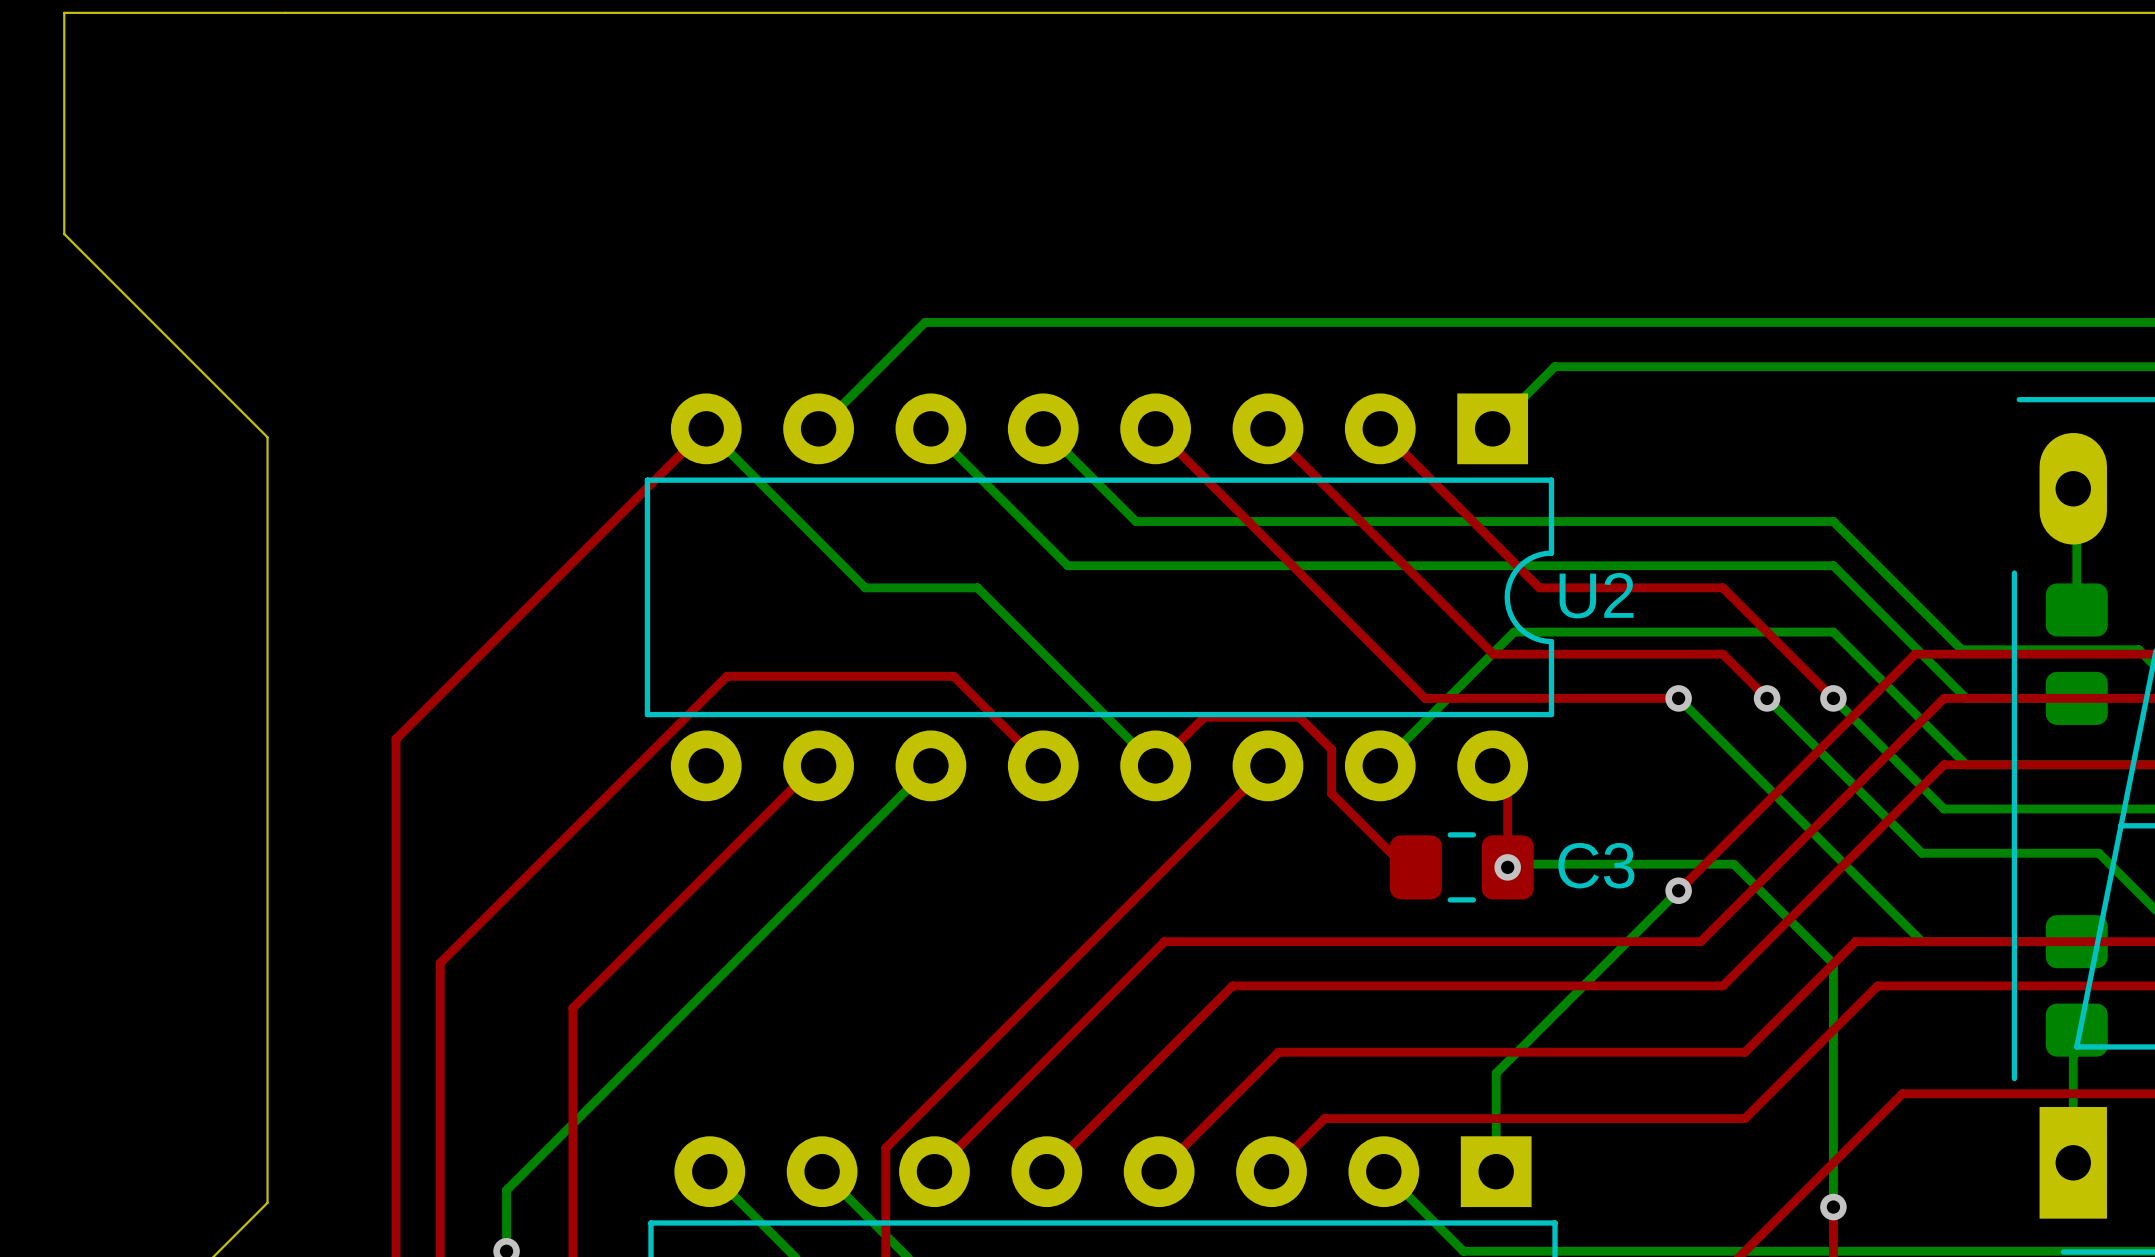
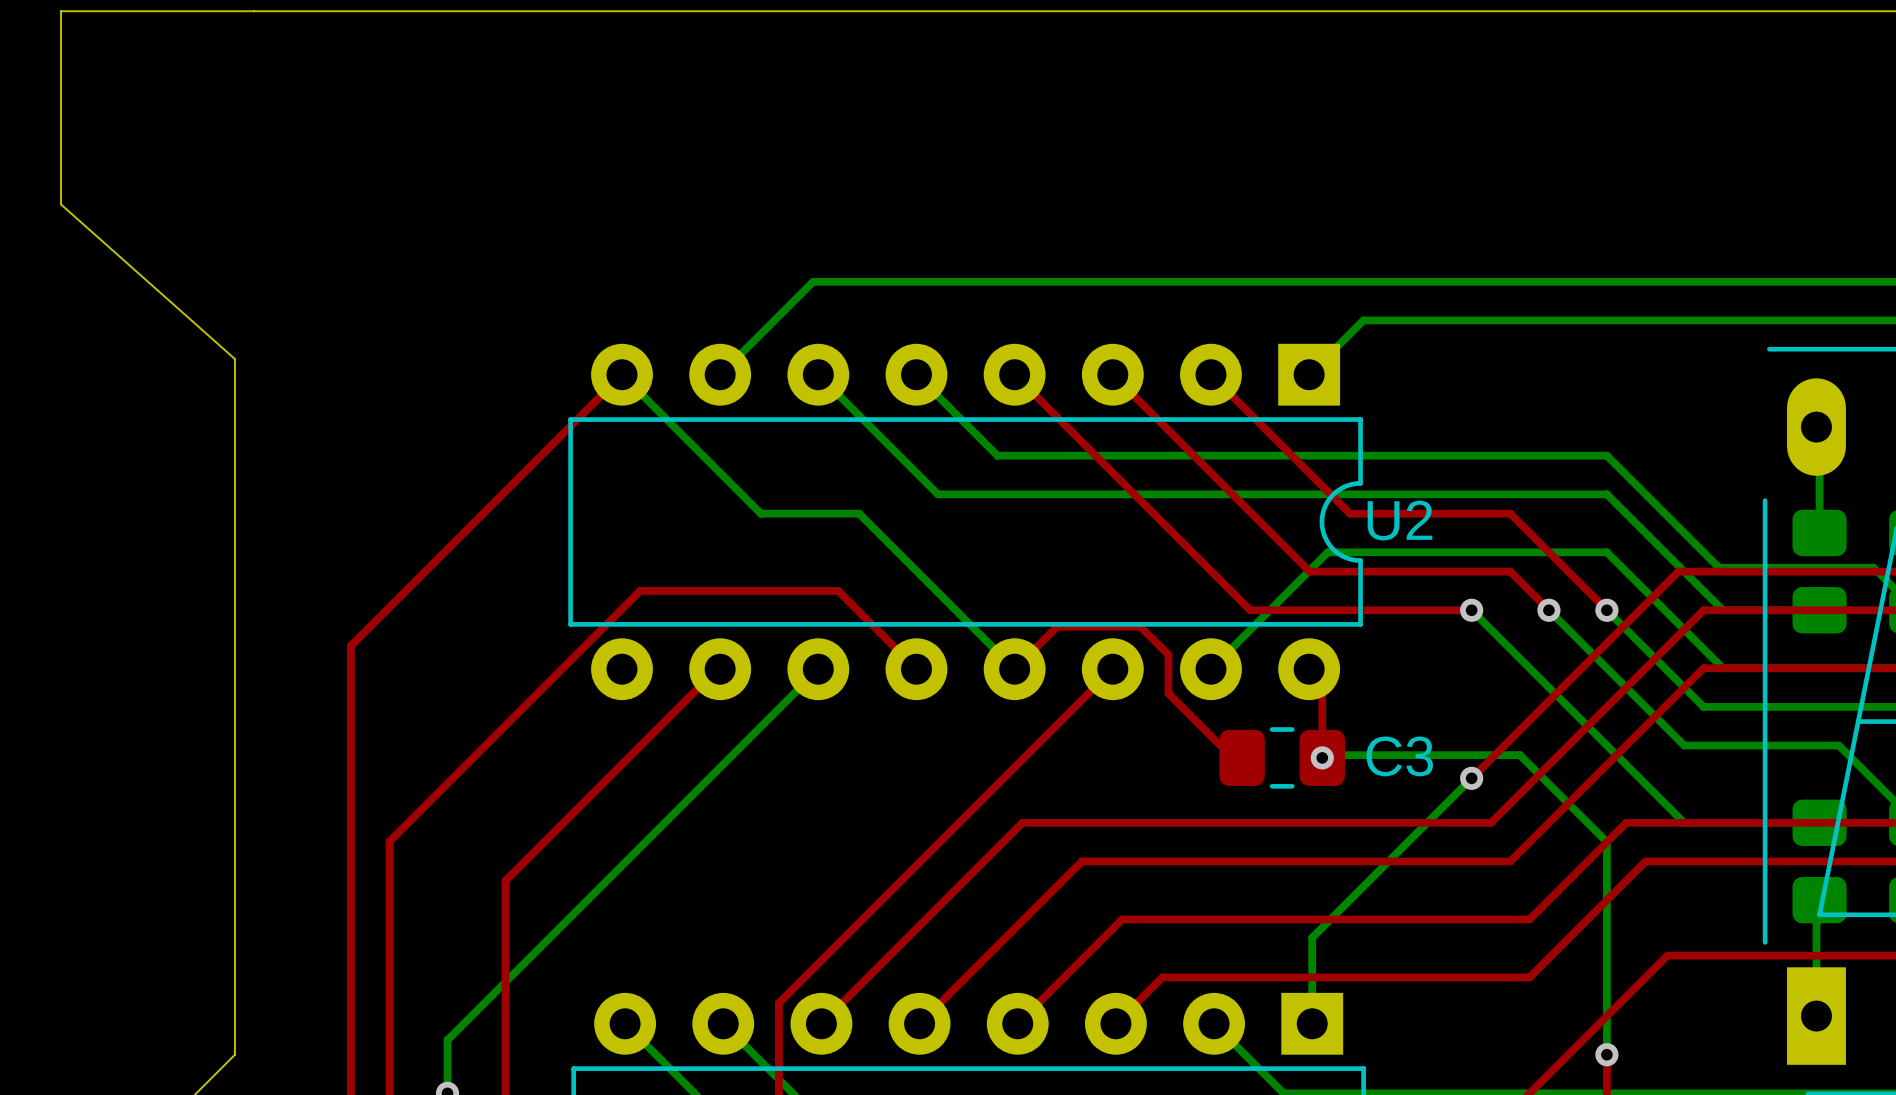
board edge: (64, 234) (267, 437) (267, 1202) (263, 1207) -> (61, 204) (234, 359) (234, 1054)

